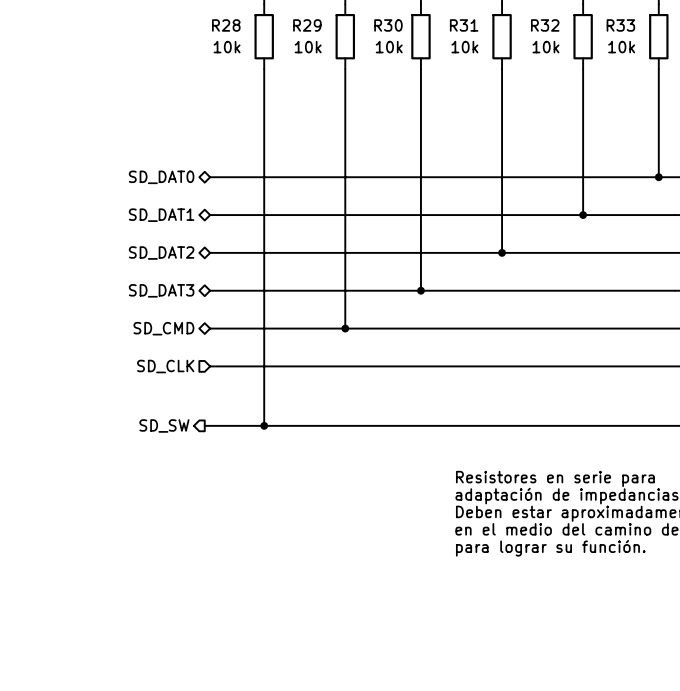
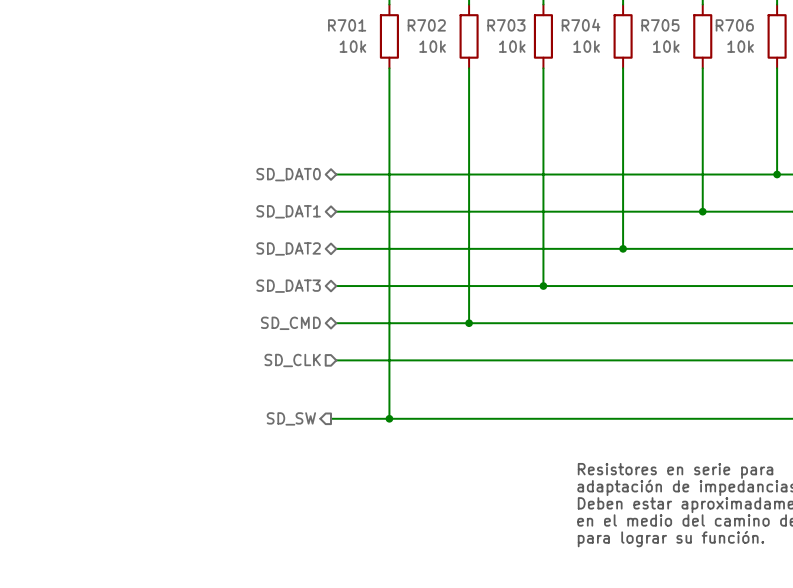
R28 name: R28 (226, 25) -> R701 (347, 25)
R29 name: R29 (307, 25) -> R702 (426, 25)
R30 name: R30 (388, 25) -> R703 (506, 25)
R31 name: R31 (464, 25) -> R704 (581, 25)
R32 name: R32 (545, 25) -> R705 (660, 25)
R33 name: R33 (620, 25) -> R706 (734, 25)

